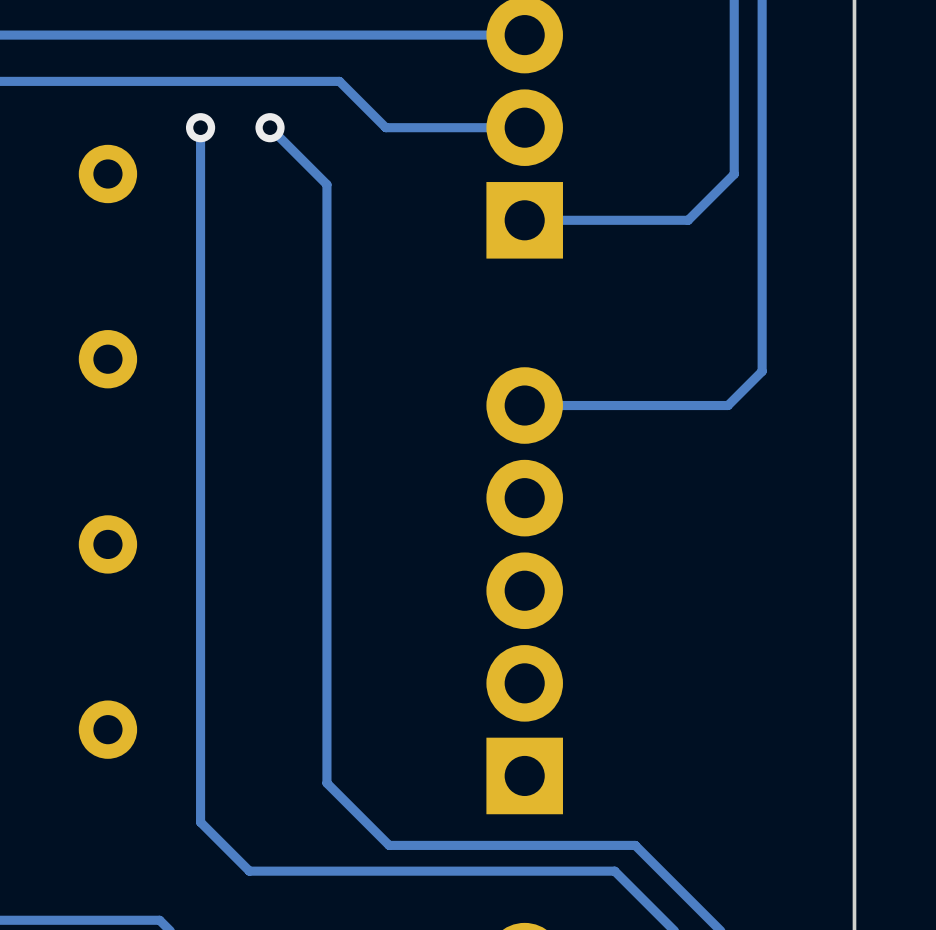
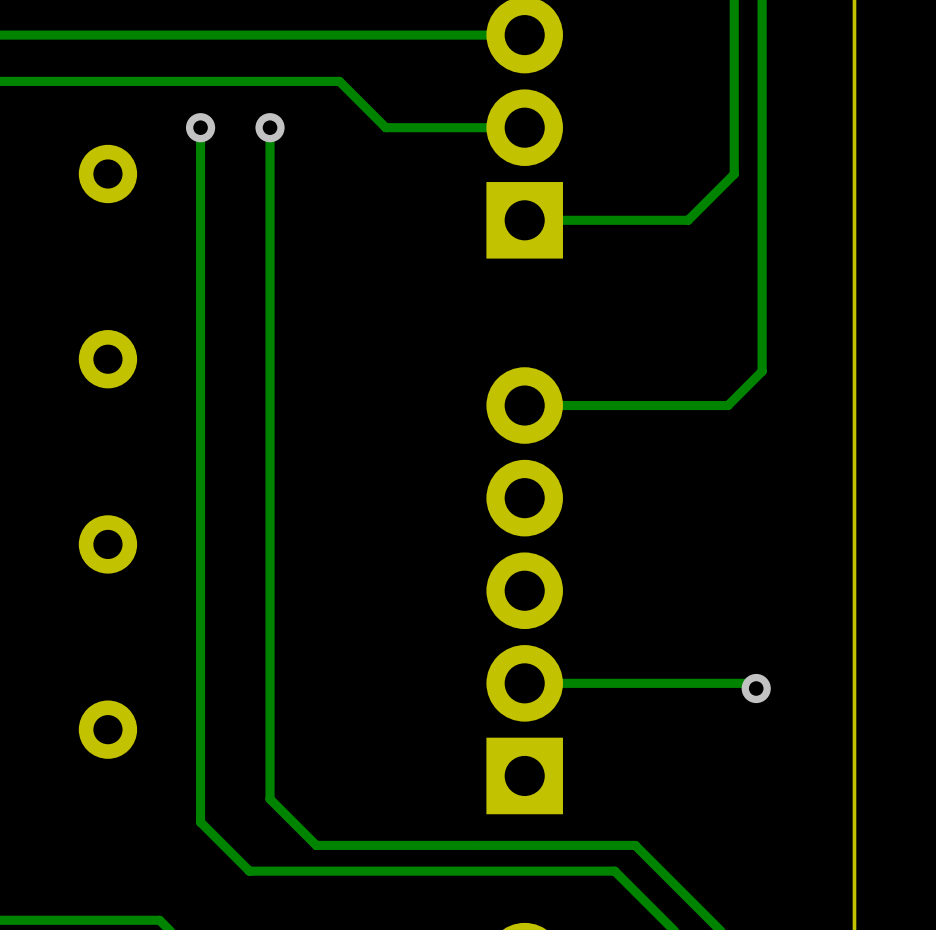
track: (270, 127) (326, 184) (326, 783) (389, 845) -> (270, 127) (270, 799) (316, 845) (389, 845)
track: none -> (524, 683) (751, 683) (756, 688)
via: none -> (756, 688)

